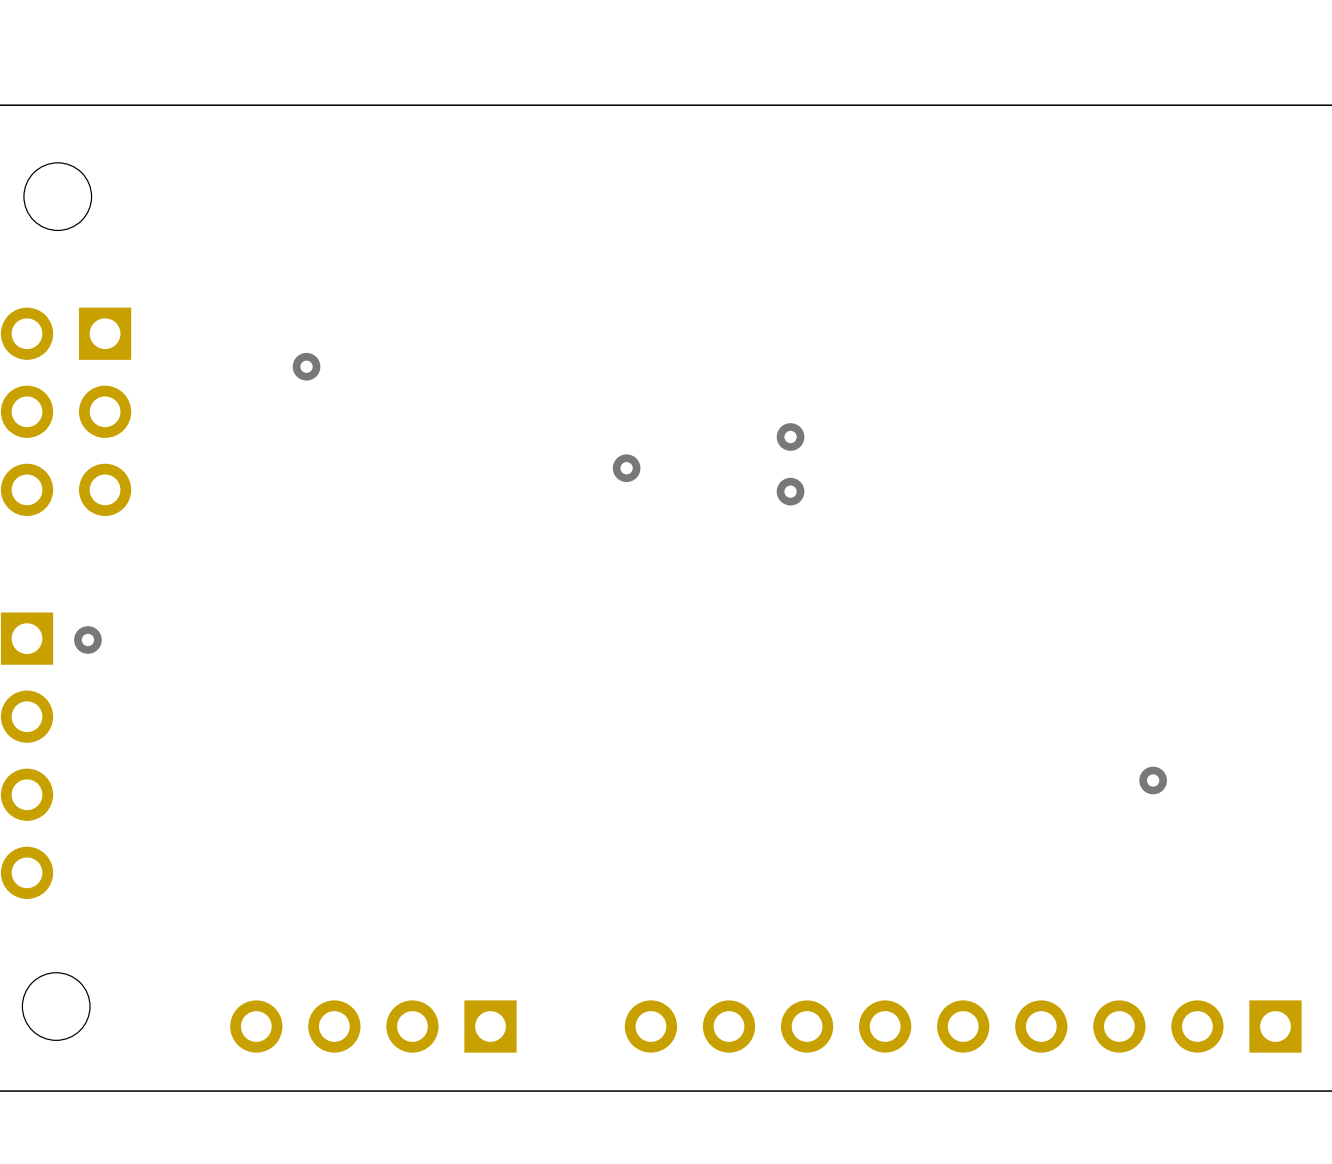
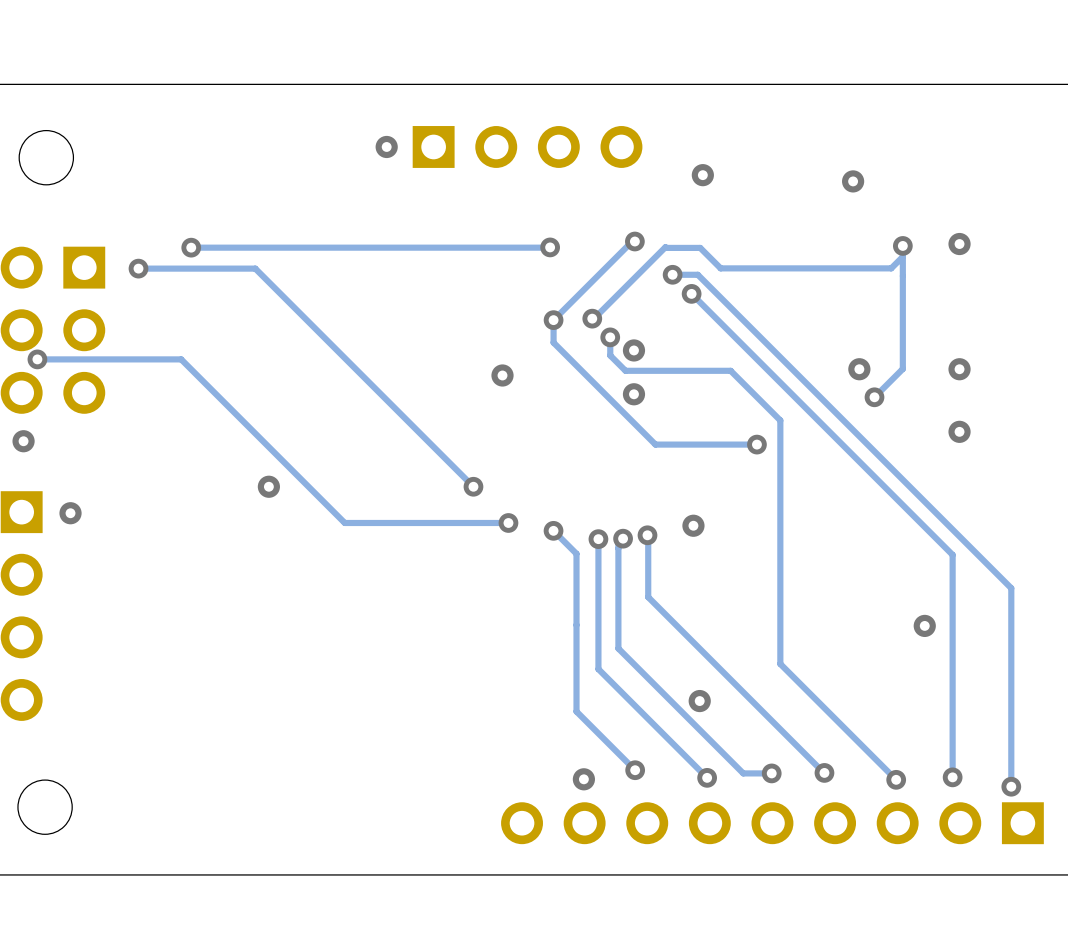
via: none -> (386, 146)
part: none -> (527, 146)
via: none -> (702, 175)
via: none -> (853, 181)
track: none -> (634, 241) (632, 241) (553, 320) (553, 342) (655, 444) (756, 444)
via: none -> (634, 241)
via: none -> (959, 244)
track: none -> (902, 245) (902, 368) (874, 397)
via: none -> (902, 245)
via: none -> (191, 247)
track: none -> (549, 247) (191, 247)
via: none -> (550, 247)
track: none -> (902, 256) (891, 268) (720, 268) (700, 247) (665, 247) (592, 318)
track: none -> (138, 268) (255, 268) (473, 486)
via: none -> (138, 268)
track: none -> (672, 274) (697, 274) (1011, 588) (1011, 786)
via: none -> (672, 274)
via: (306, 366) -> none
track: none -> (691, 293) (952, 554) (952, 777)
via: none -> (691, 293)
via: none -> (592, 318)
via: none -> (553, 320)
track: none -> (610, 337) (610, 355) (625, 370) (730, 370) (780, 420) (780, 663) (896, 779)
via: none -> (610, 337)
track: none -> (37, 359) (181, 359) (344, 522) (508, 522)
via: none -> (37, 359)
via: none -> (859, 369)
via: none -> (959, 369)
via: none -> (874, 397)
via: none -> (959, 431)
via: none -> (23, 441)
via: none -> (756, 444)
via: none -> (268, 486)
via: none -> (473, 486)
via: none -> (508, 522)
via: none -> (693, 525)
track: none -> (553, 530) (576, 553) (576, 711) (635, 770)
via: none -> (553, 530)
track: none -> (647, 535) (648, 597) (823, 772)
via: none -> (647, 535)
track: none -> (623, 538) (618, 543) (618, 648) (743, 773) (771, 773)
via: none -> (623, 538)
track: none -> (598, 539) (598, 669) (707, 777)
via: none -> (598, 539)
via: none -> (699, 701)
via: none -> (635, 770)
via: none -> (824, 772)
via: none -> (771, 773)
via: none -> (707, 777)
via: none -> (952, 777)
via: none -> (583, 779)
via: none -> (896, 779)
via: none -> (1011, 786)
part: (373, 1026) -> none

